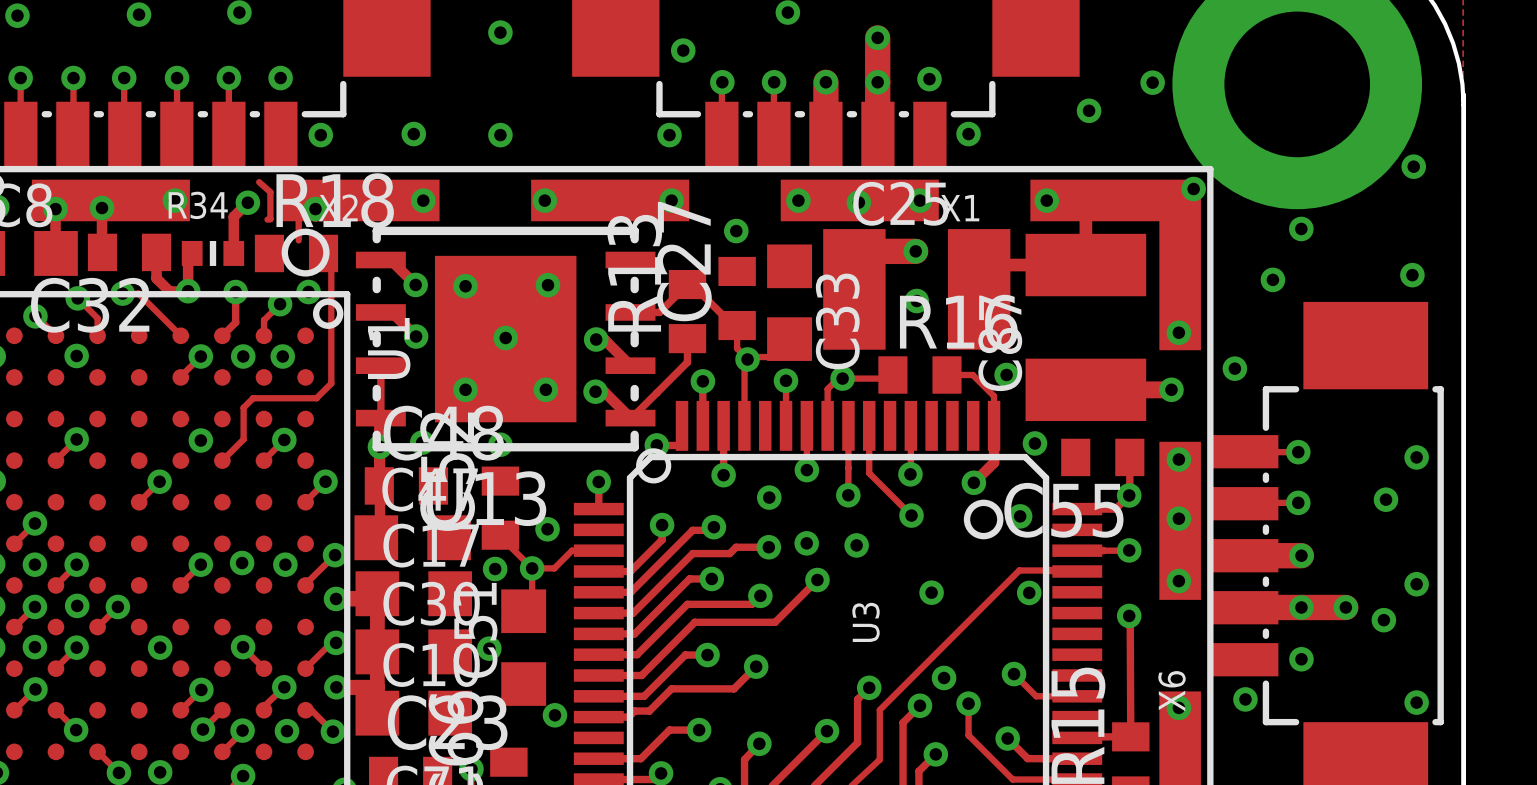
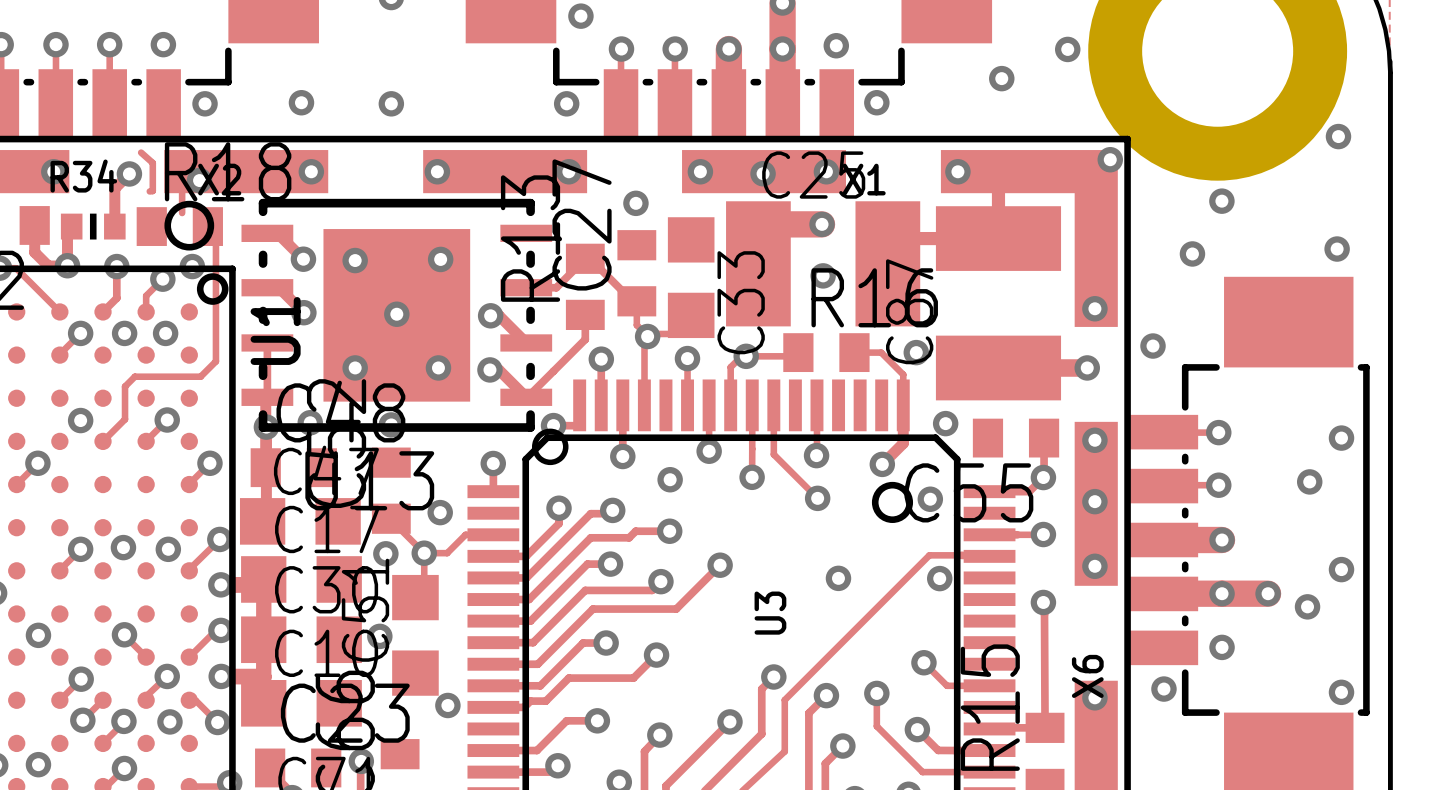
via: (806, 543) -> none
via: (856, 545) -> none
via: (944, 677) -> none

